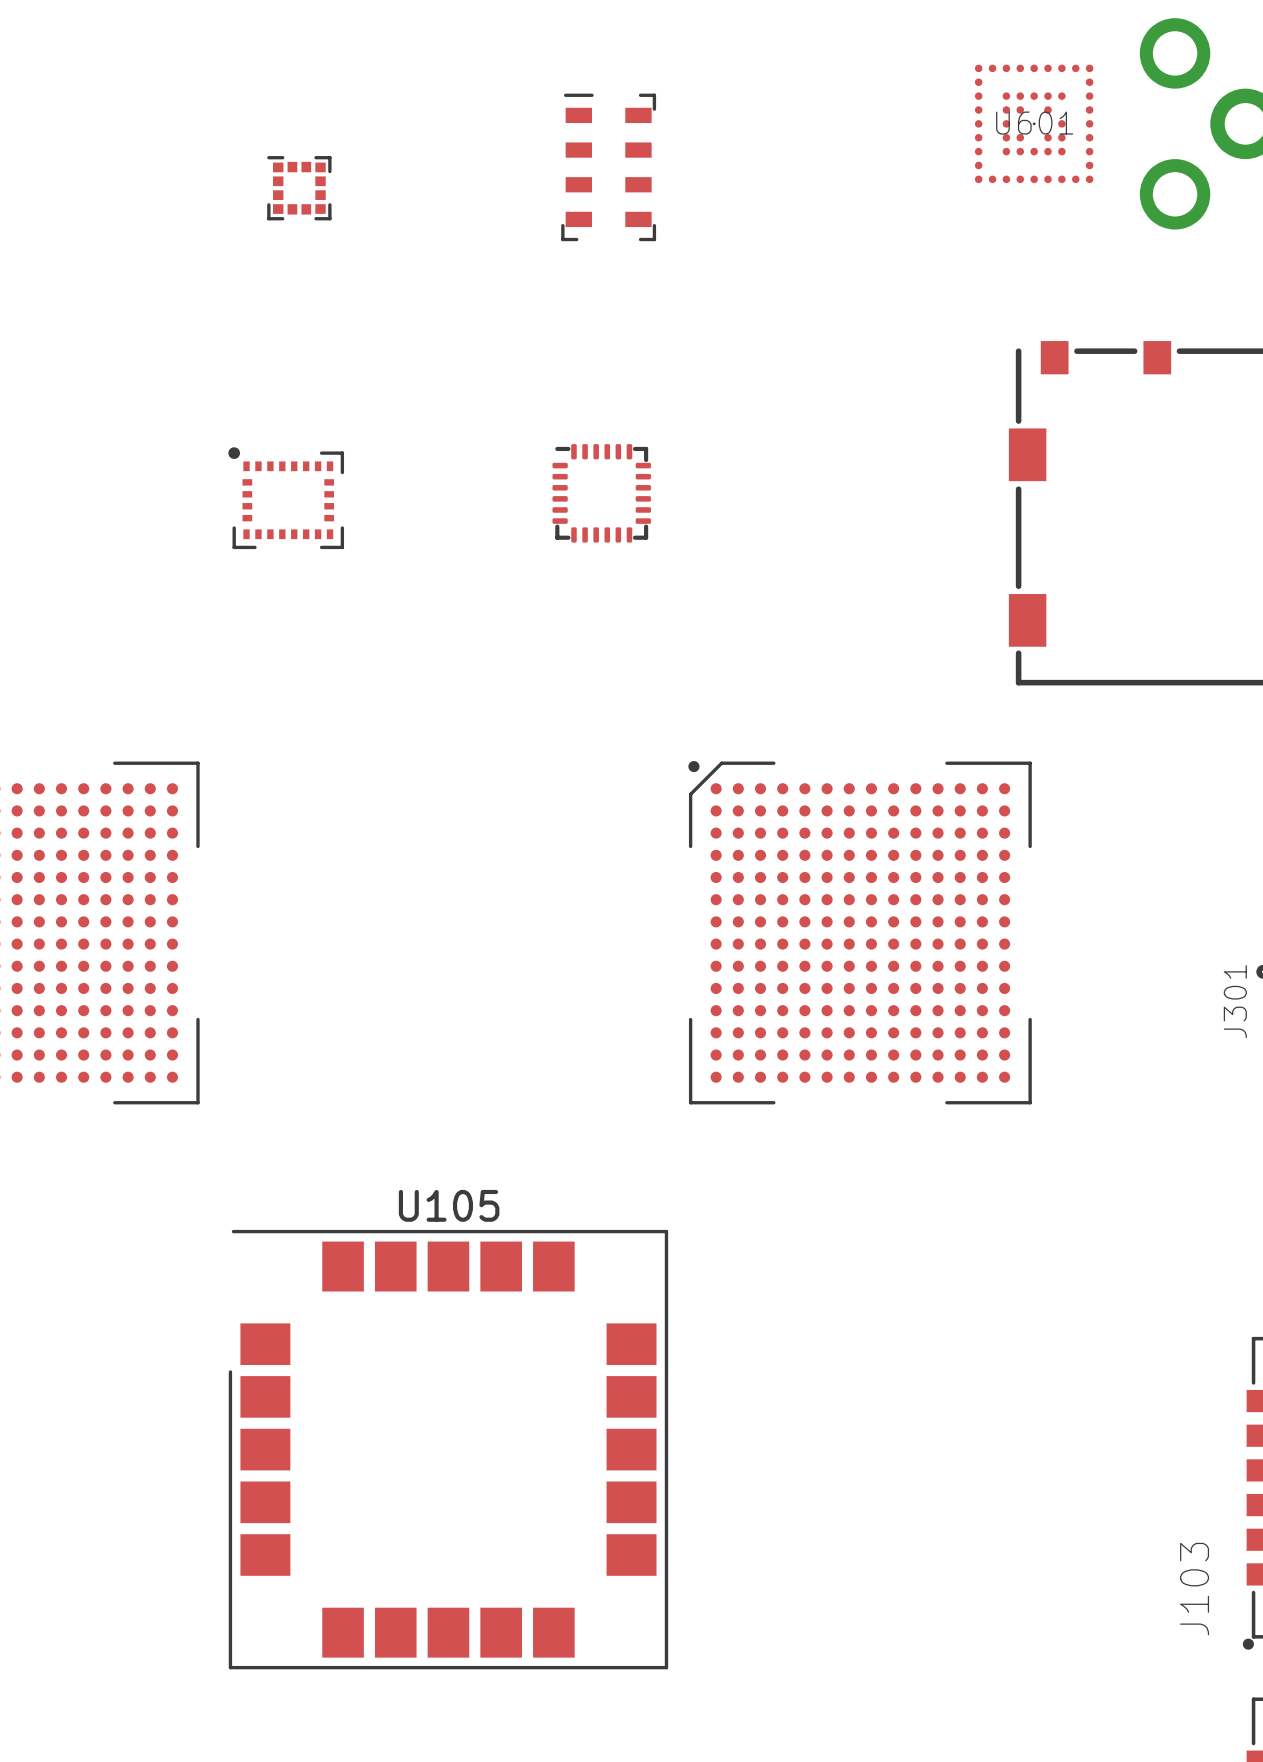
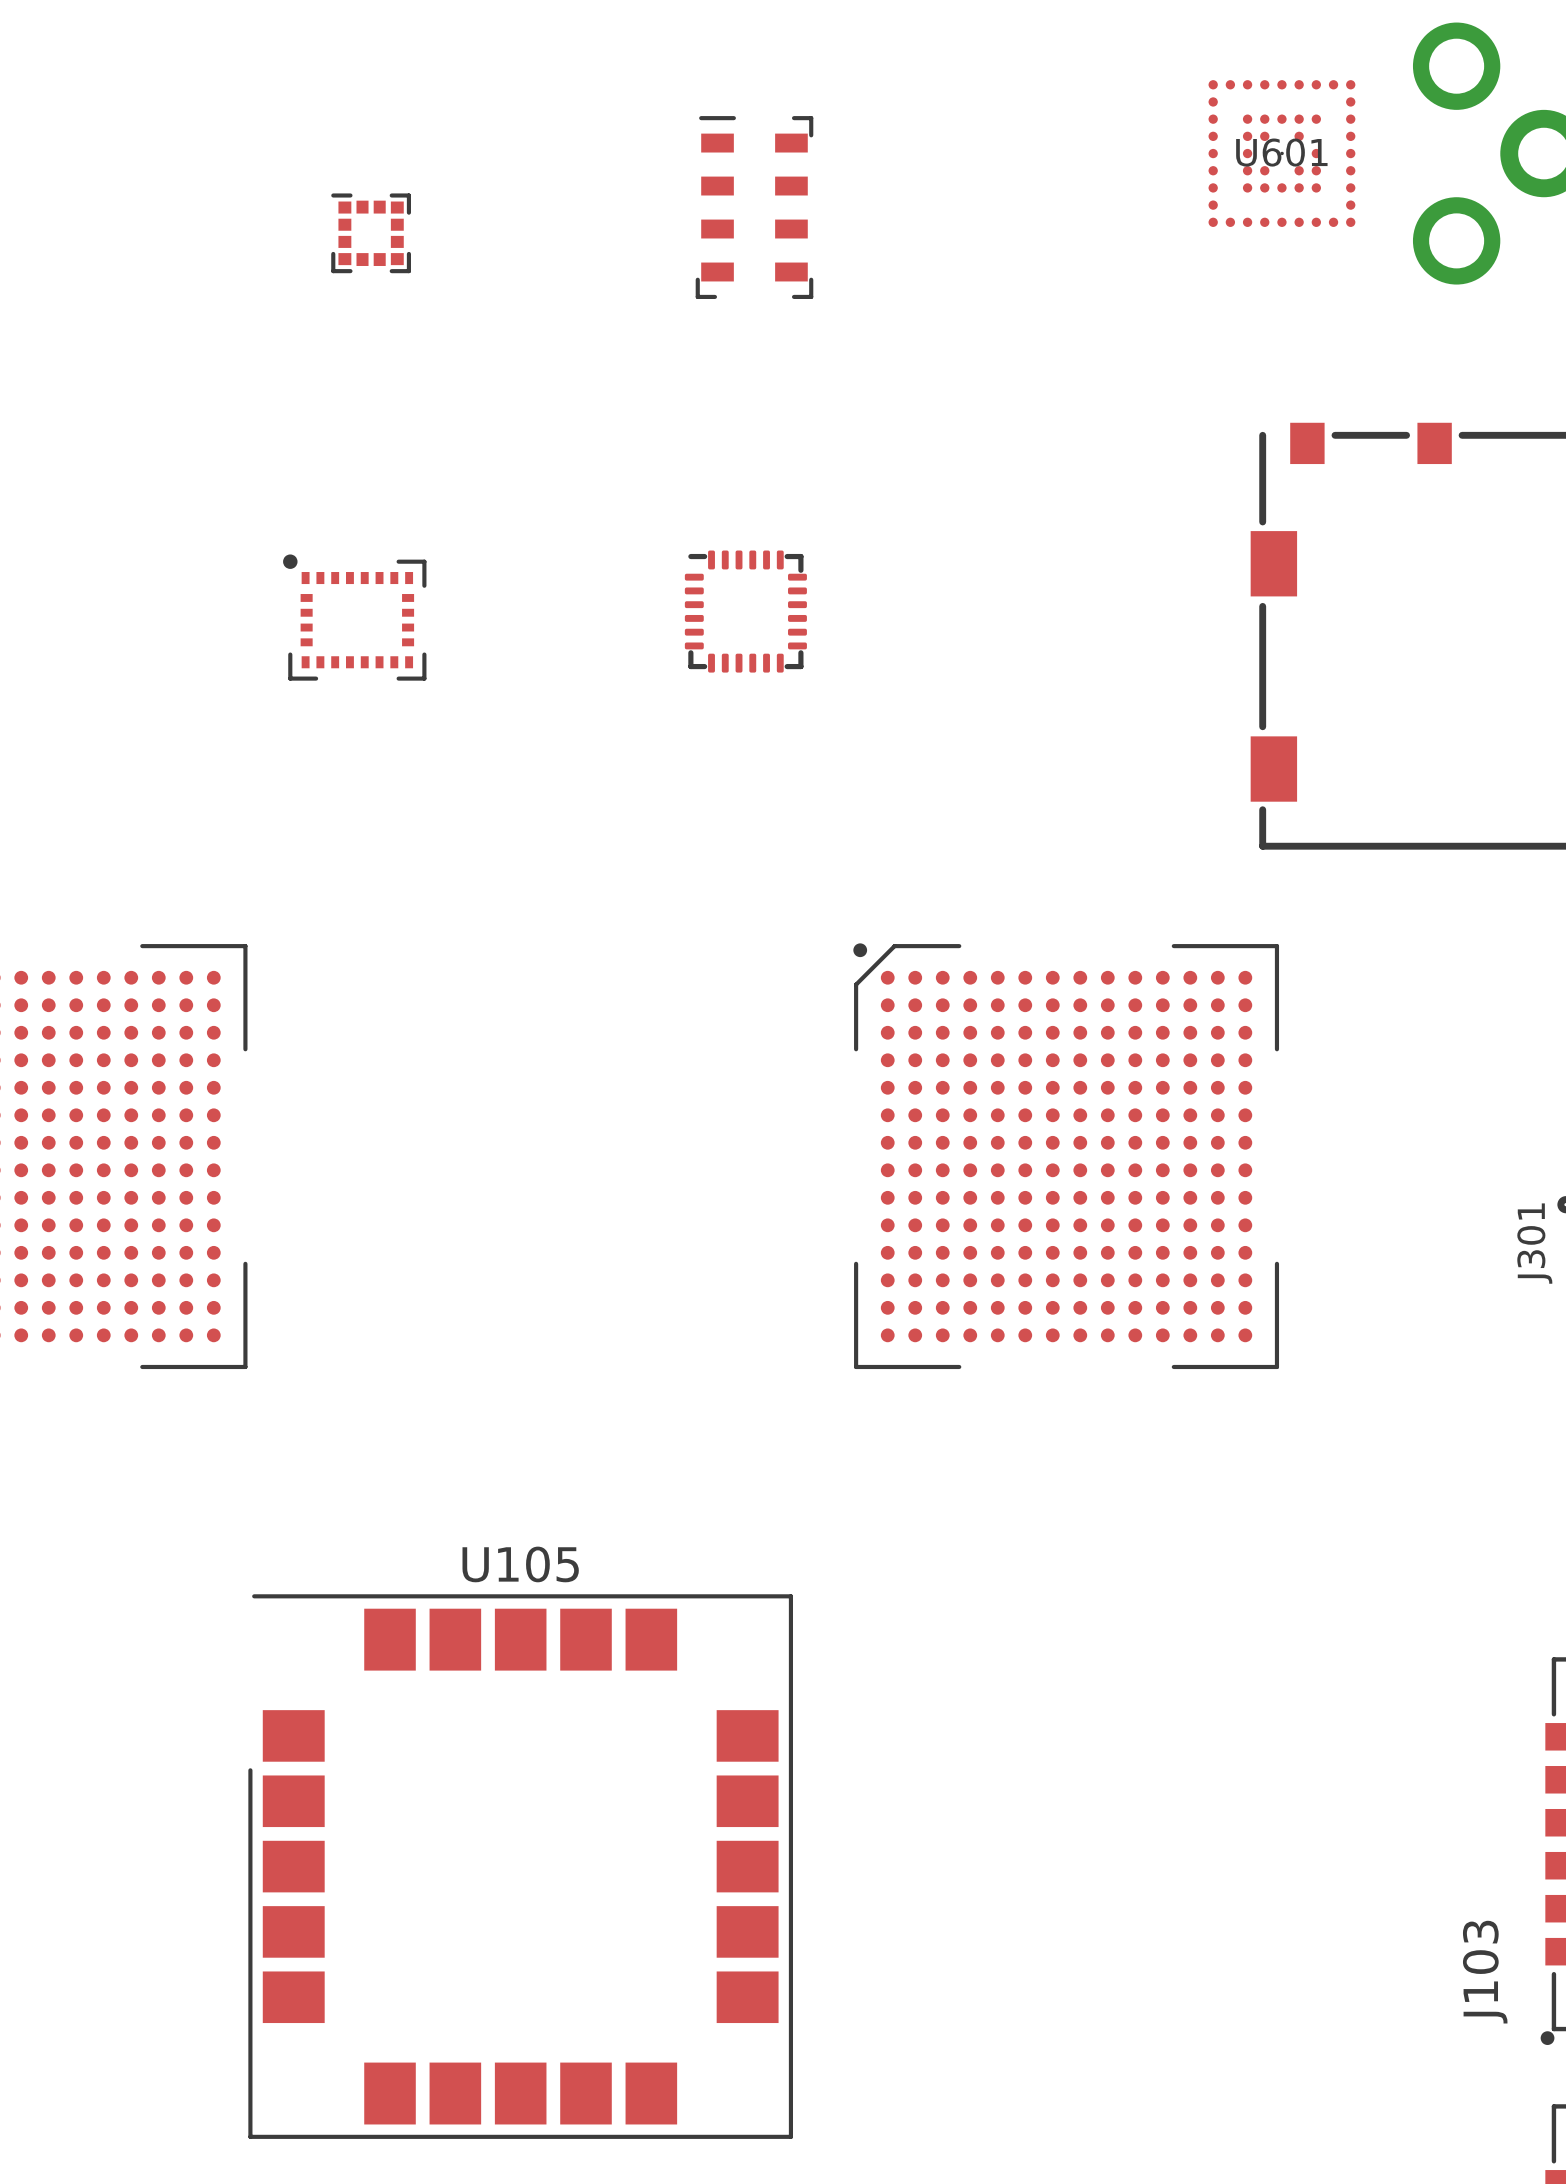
U105 position: (448, 1449) -> (520, 1866)

